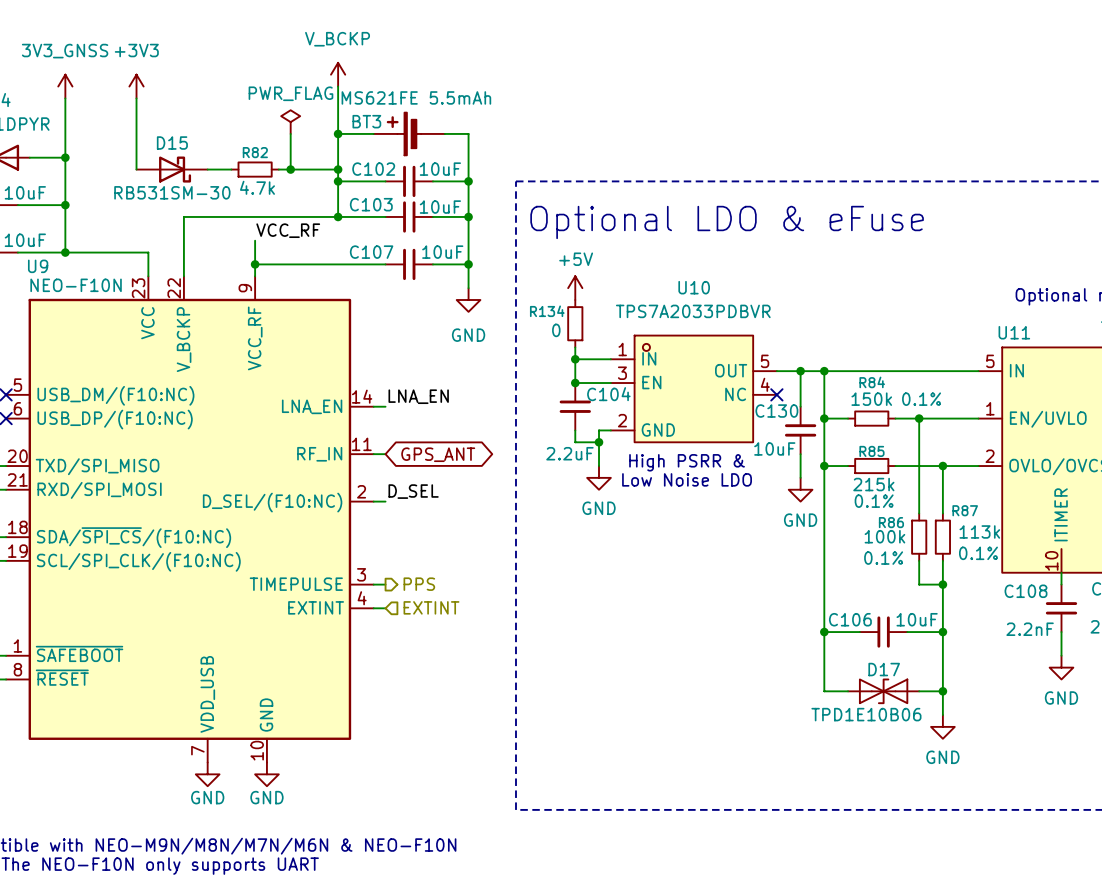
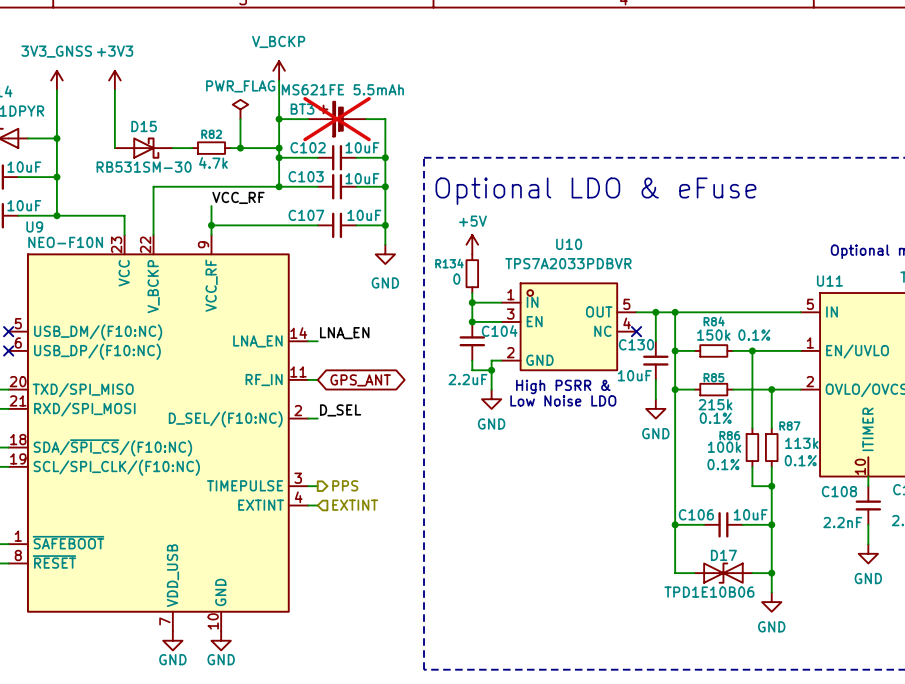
BT3 do-not-place cross: none -> (337, 119)

